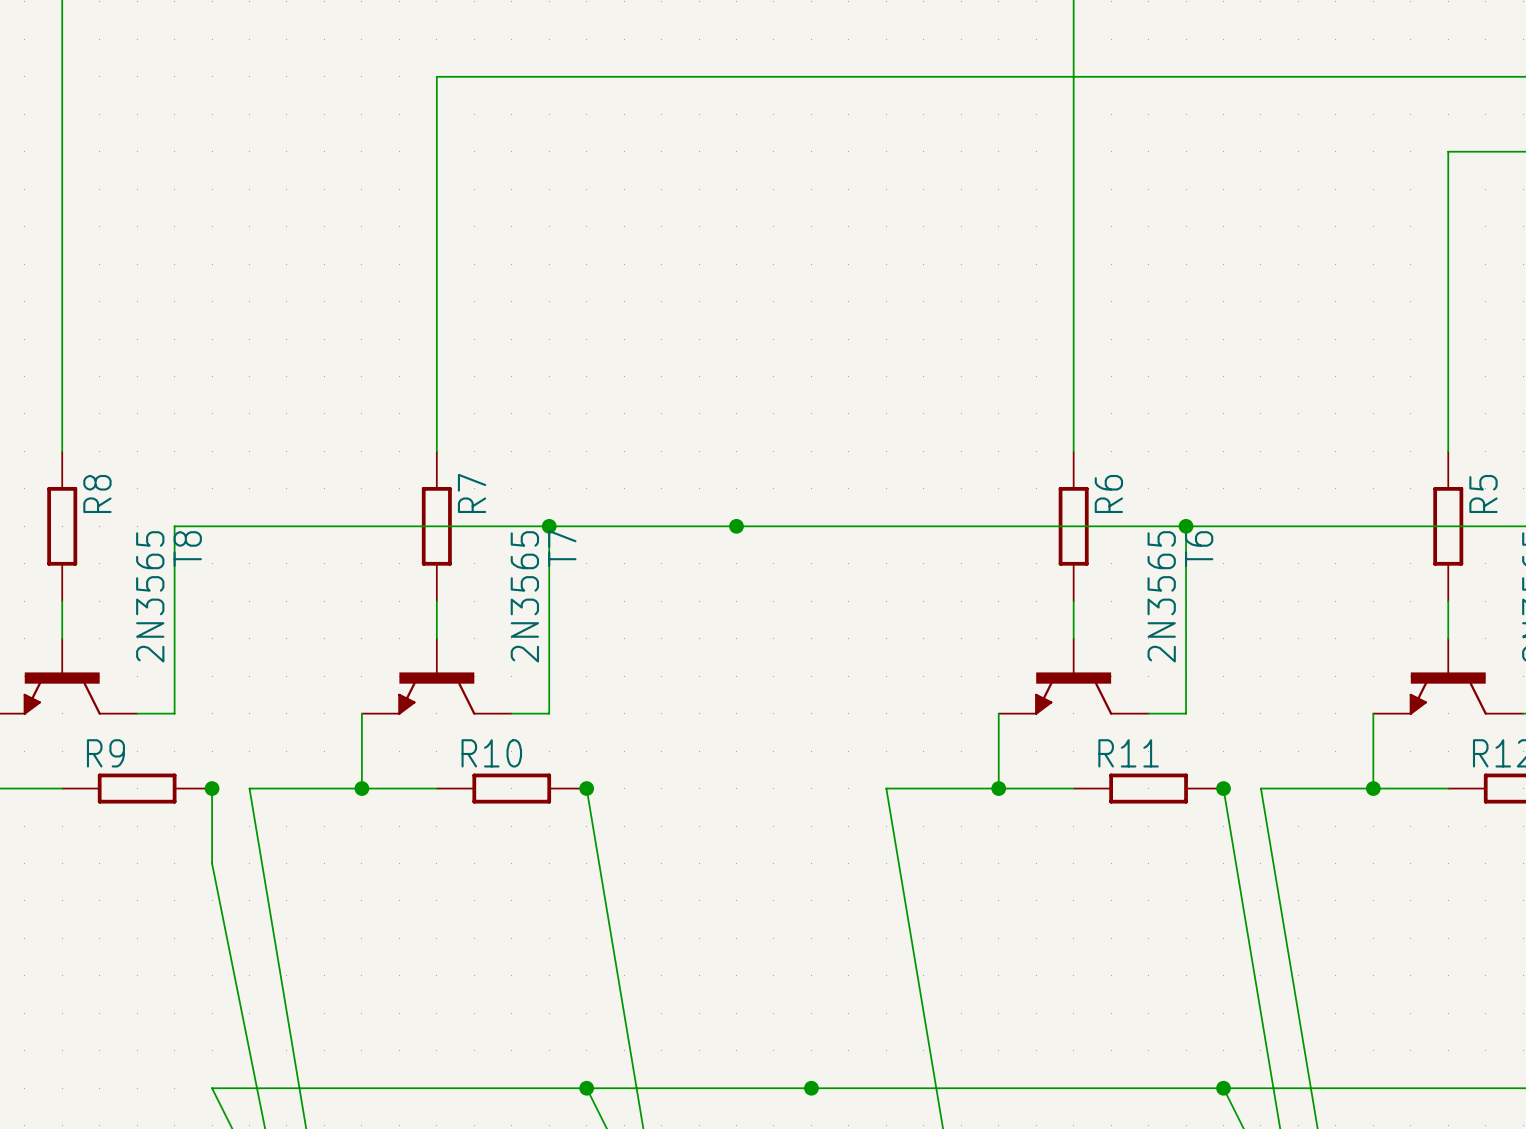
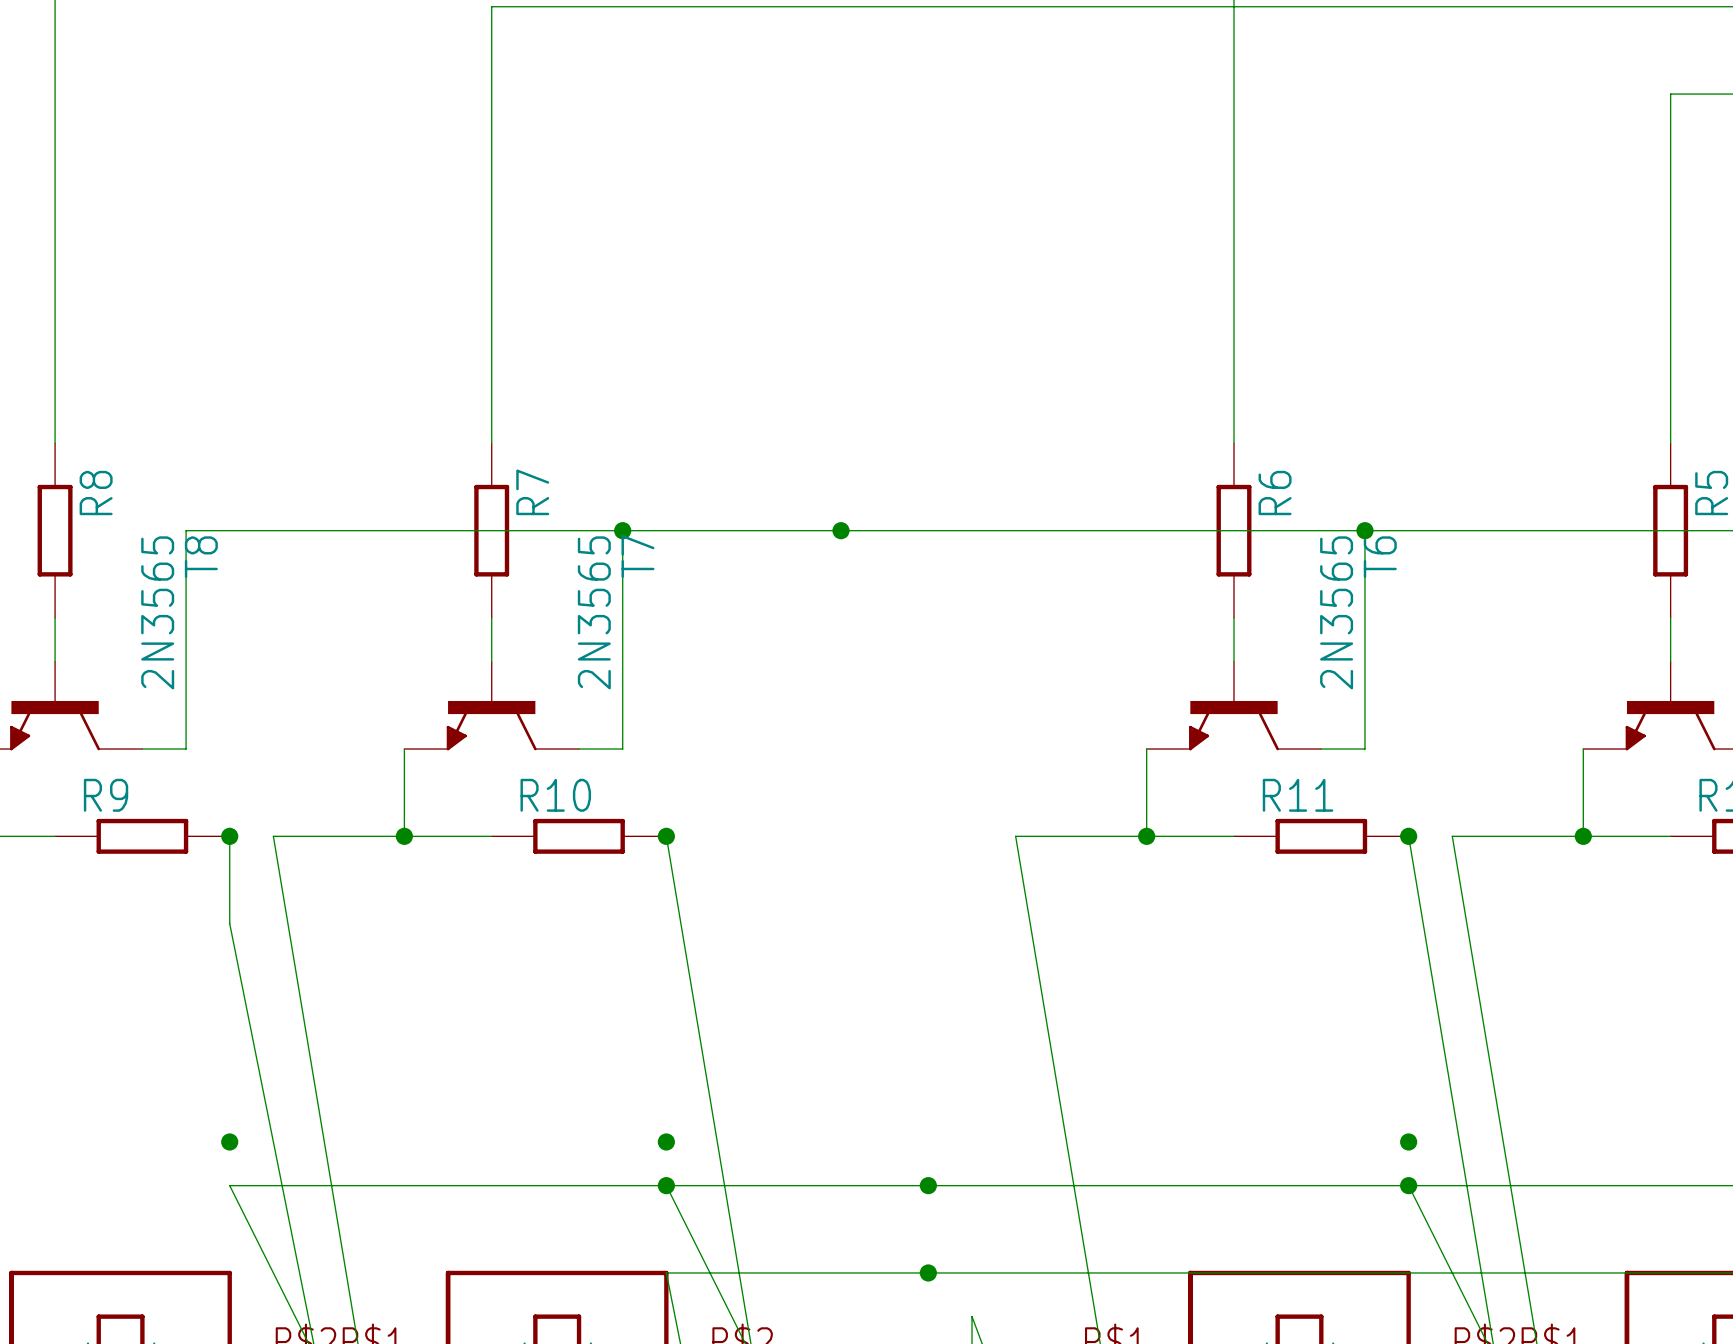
junction: none -> (229, 1141)
junction: none -> (666, 1141)
junction: none -> (1408, 1141)

